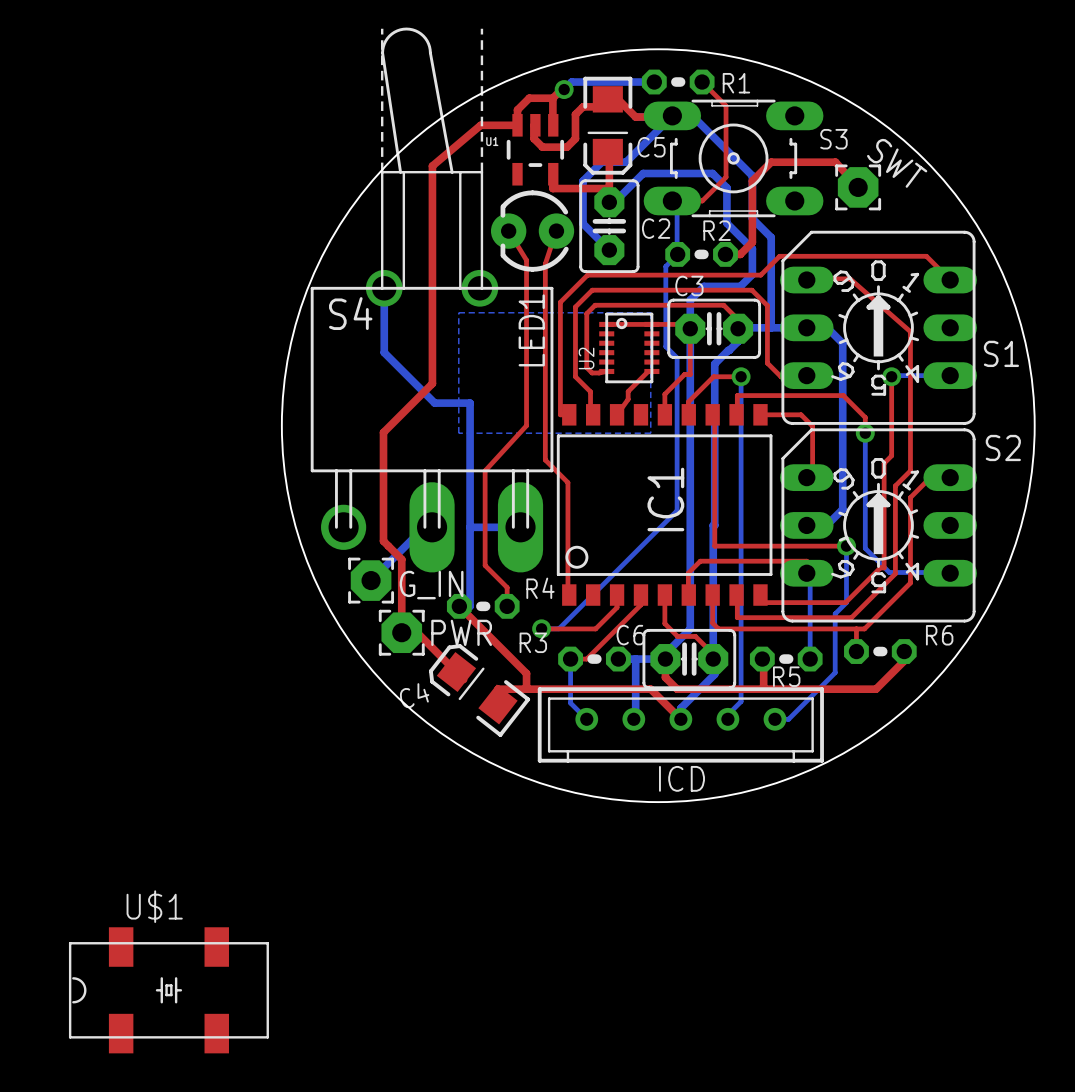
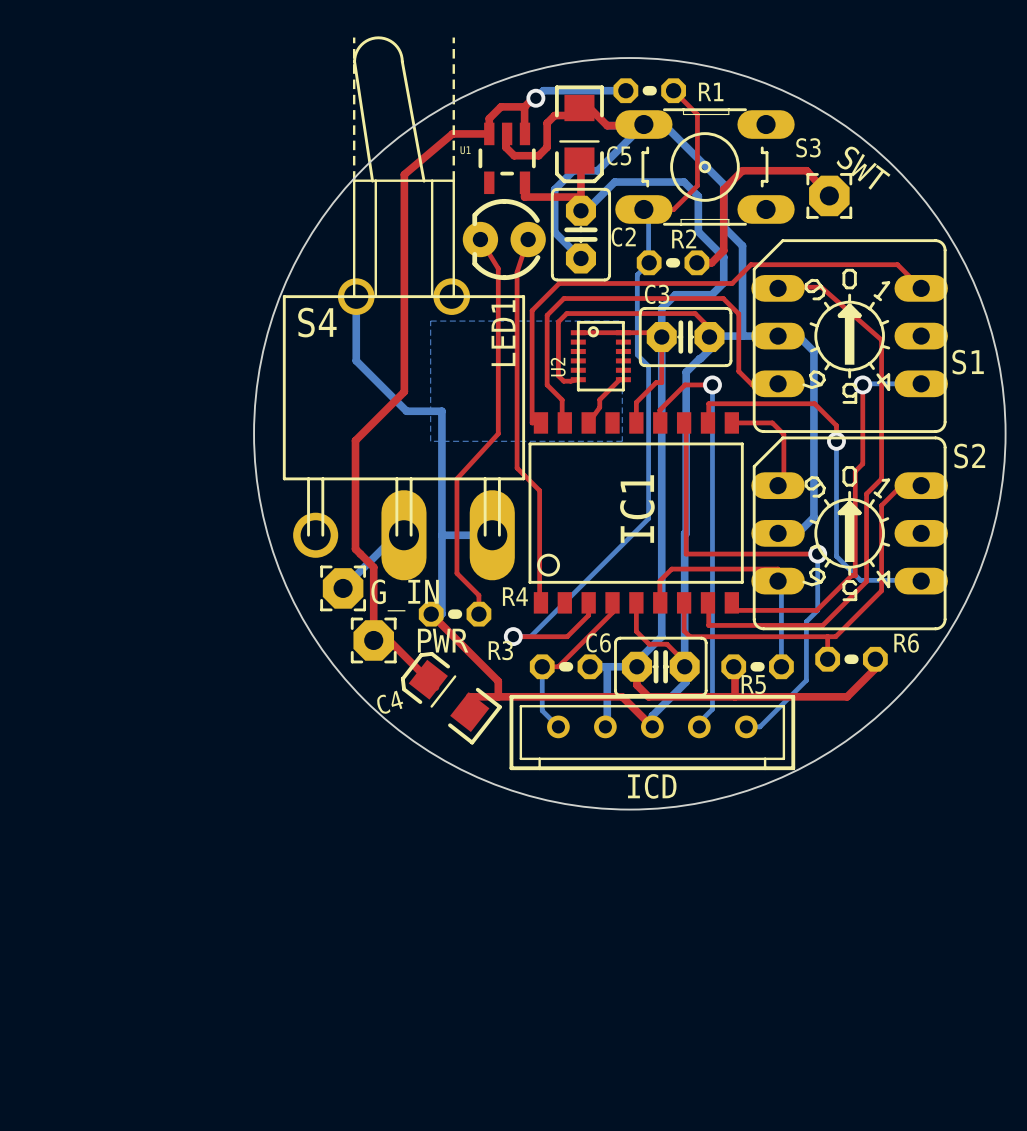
U$1: (168, 990) -> none

